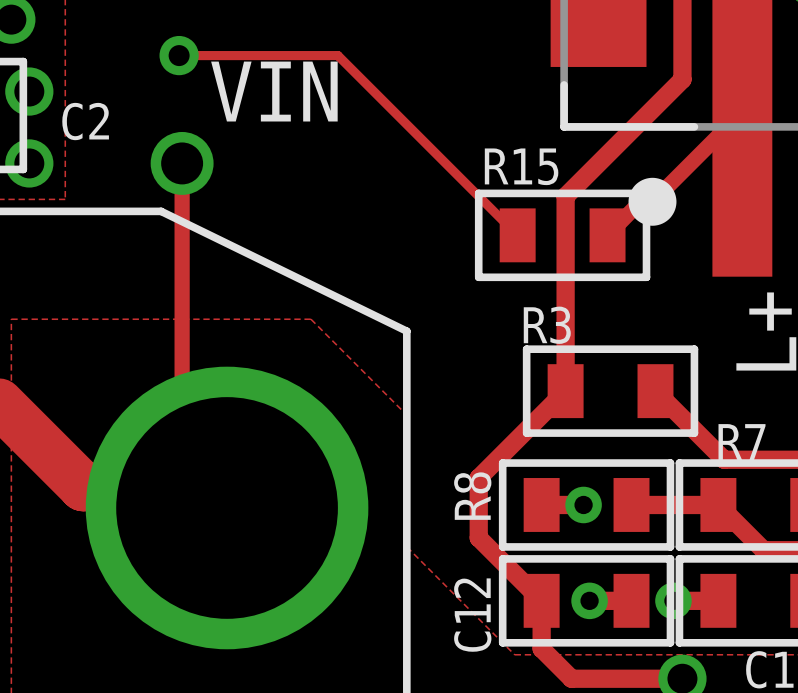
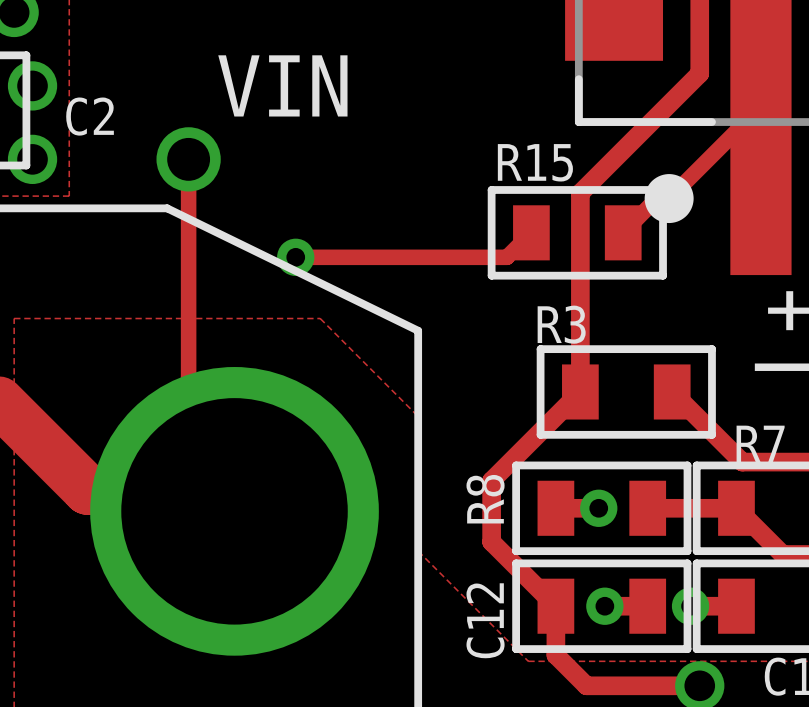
track: (179, 55) (337, 55) (517, 235) -> (295, 257) (506, 257) (531, 232)
via: (179, 55) -> none
via: none -> (295, 257)

